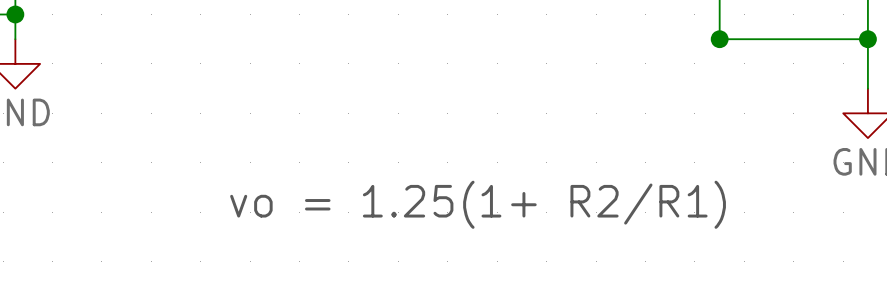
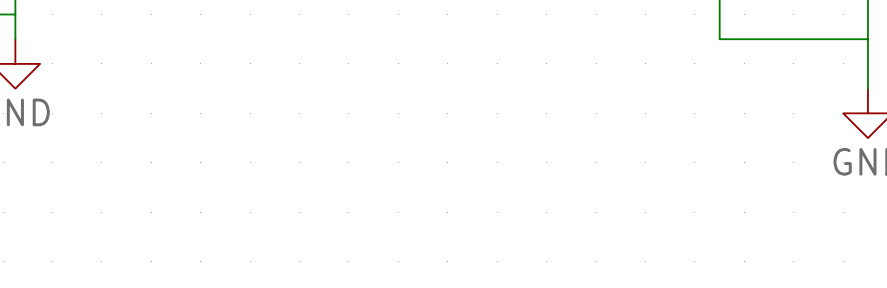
junction: (15, 14) -> none
junction: (719, 39) -> none
junction: (867, 39) -> none
text: vo = 1.25(1+ R2/R1) (478, 204) -> none

